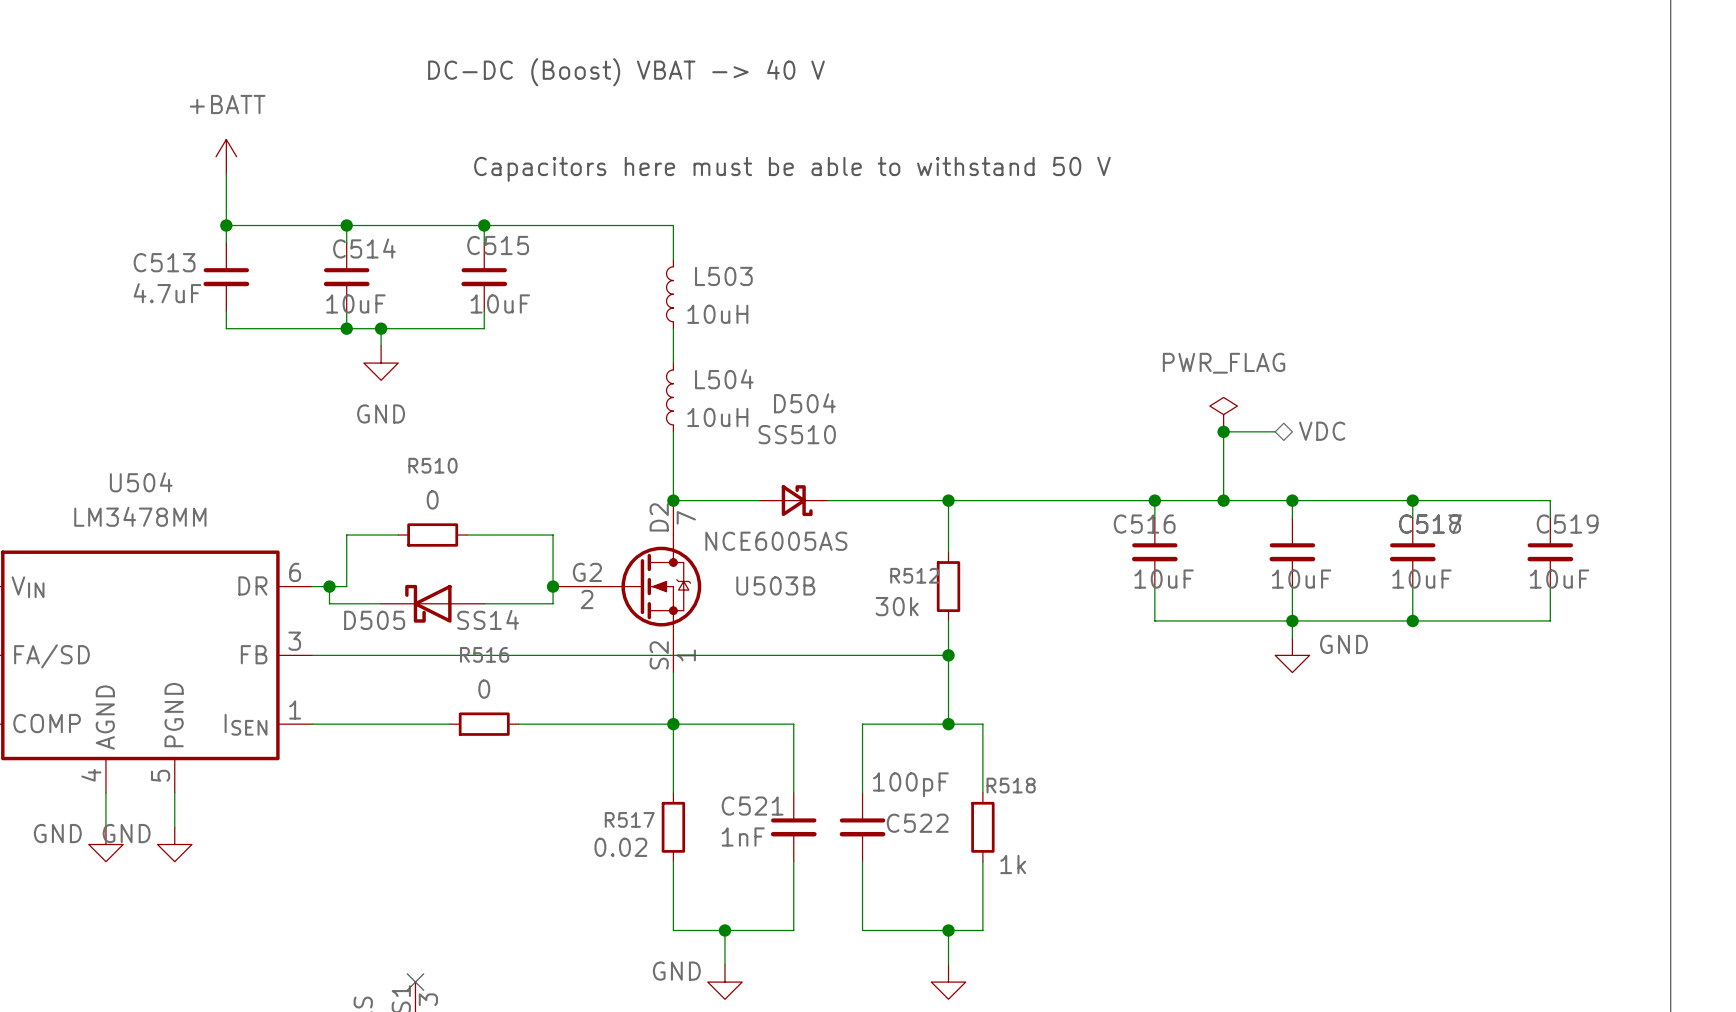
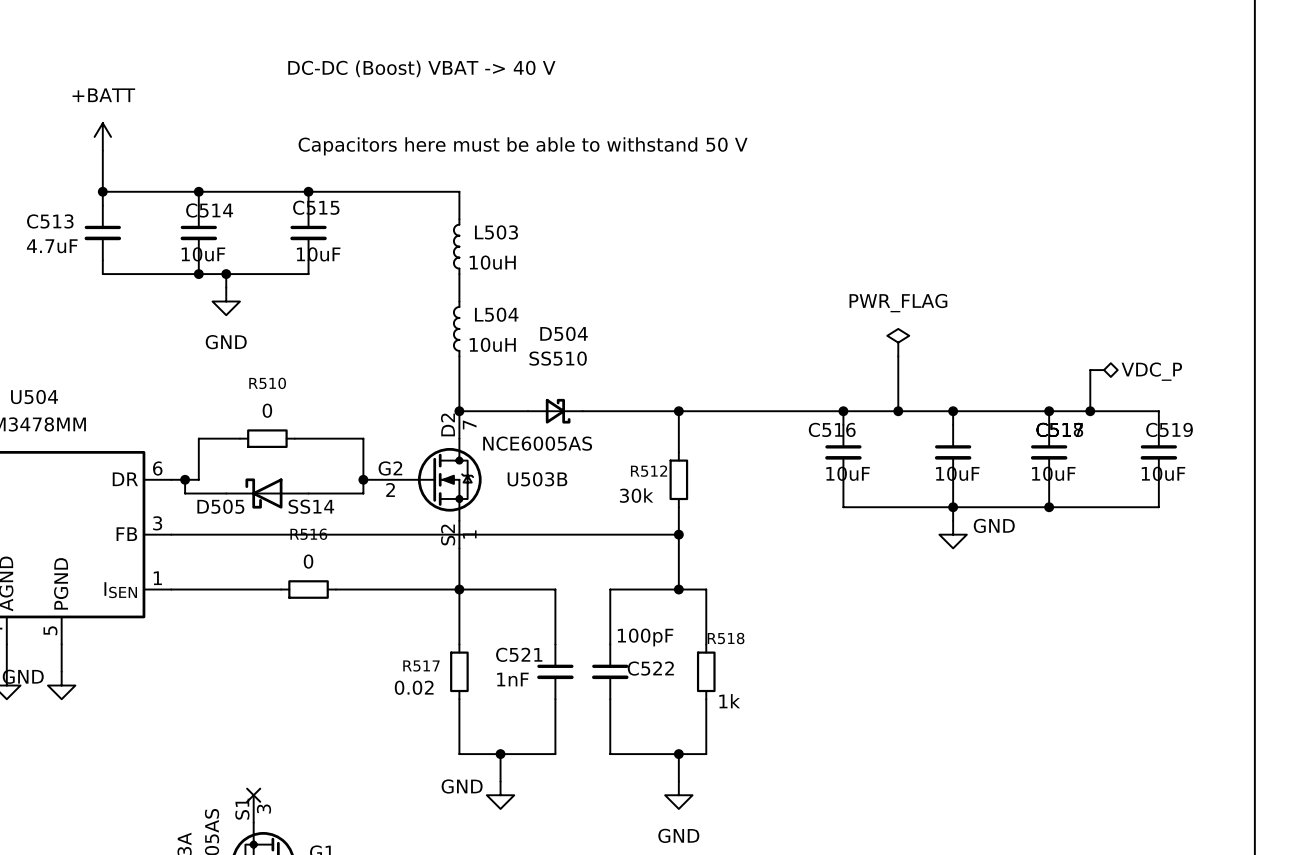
wire: (1223, 431) (1275, 431) -> none
junction: (1223, 431) -> none
hierarchical label: VDC (1322, 431) -> none
wire: none -> (1104, 370) (1090, 370) (1090, 411)
hierarchical label: none -> VDC_P (1151, 371)
junction: none -> (1090, 411)

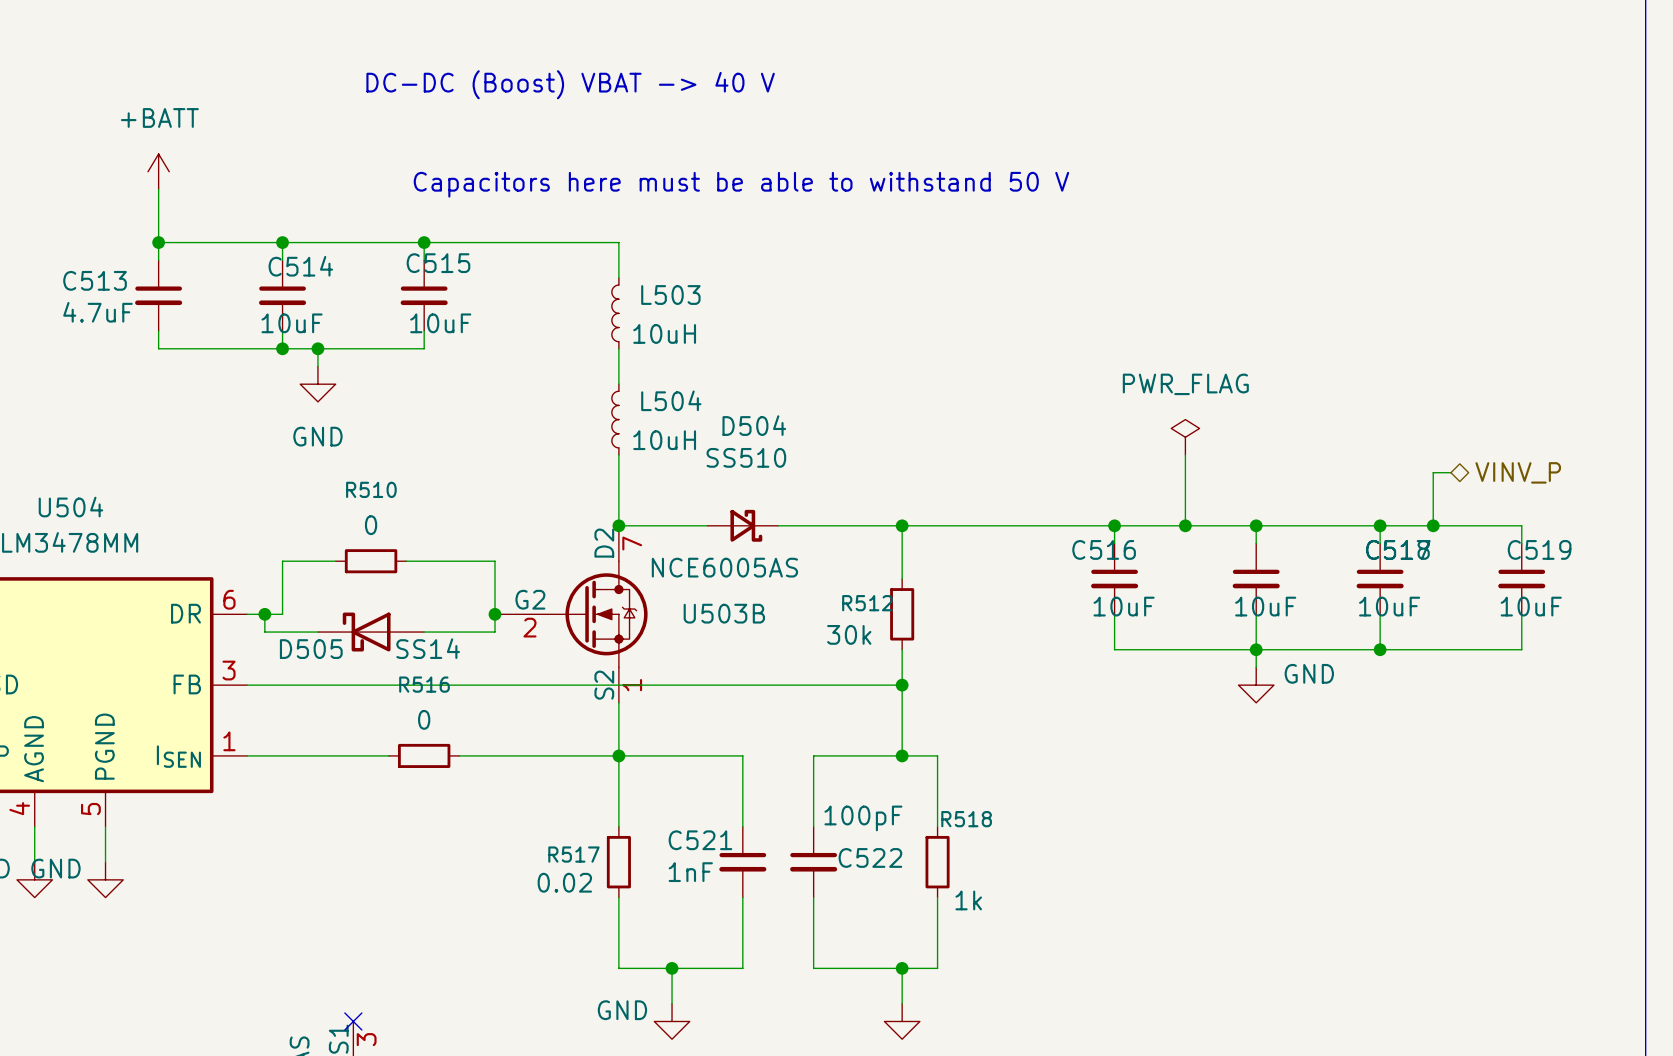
hierarchical label: VDC_P (1151, 371) -> VINV_P (1518, 472)

